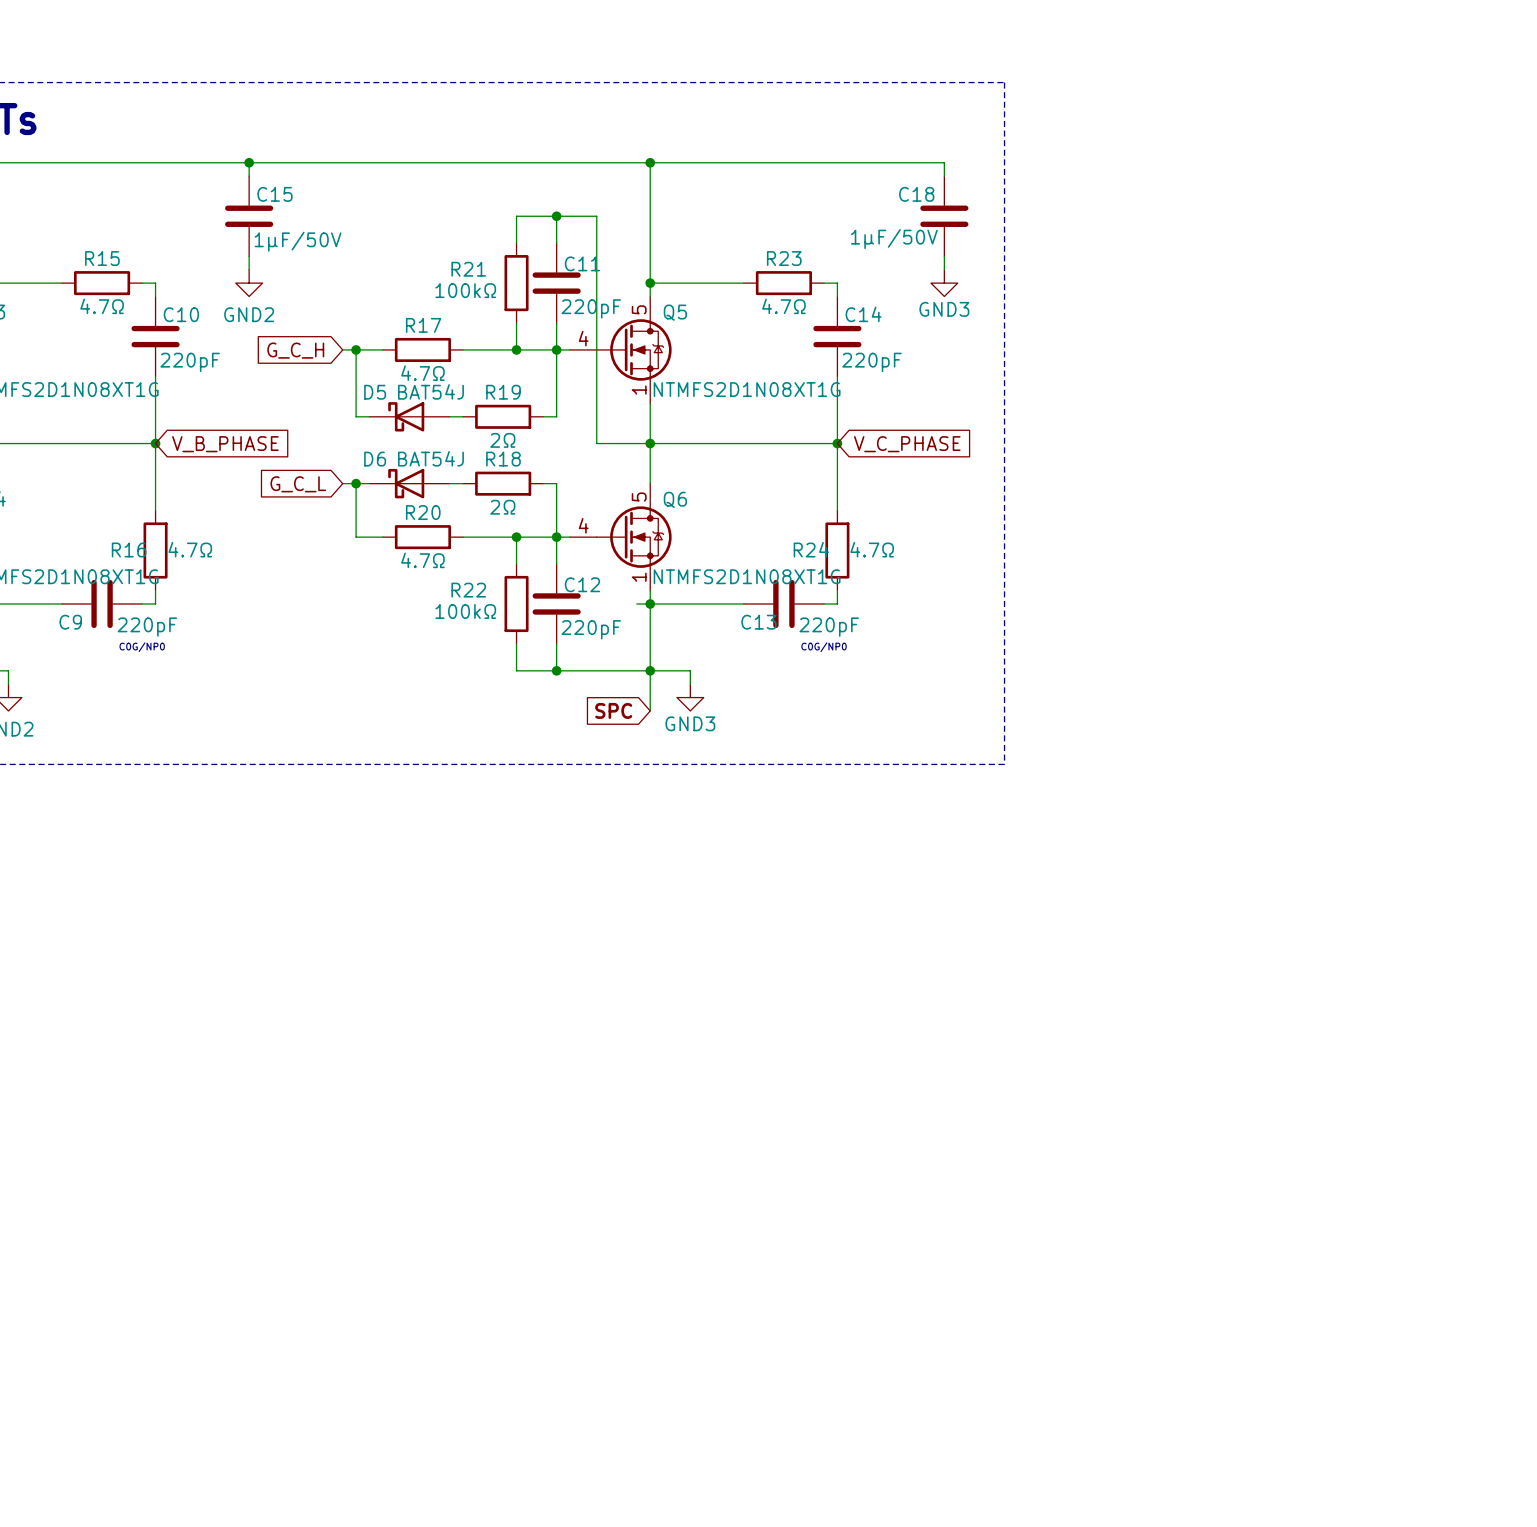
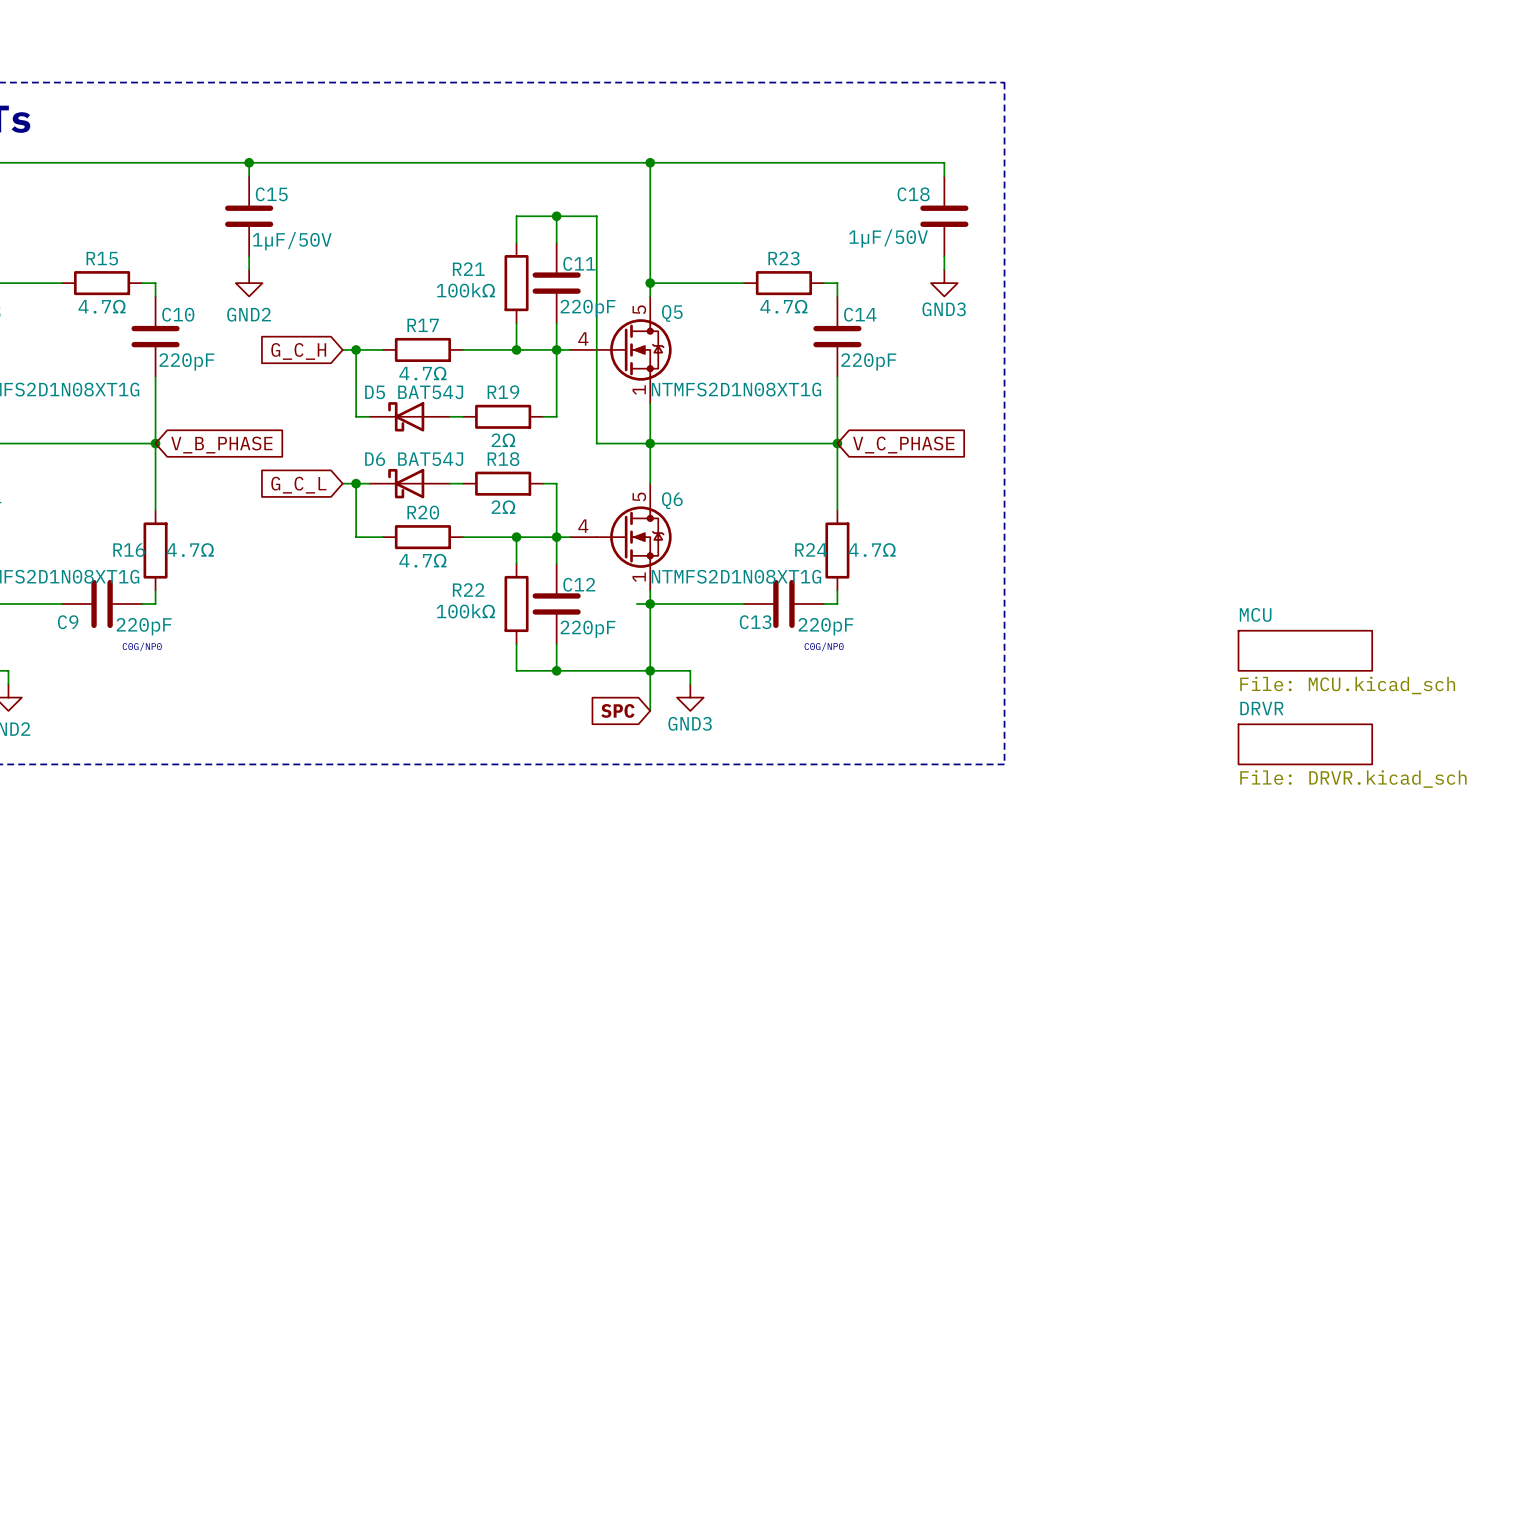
sheet MCU: none -> File: MCU.kicad_sch (1305, 650)
sheet DRVR: none -> File: DRVR.kicad_sch (1305, 744)

